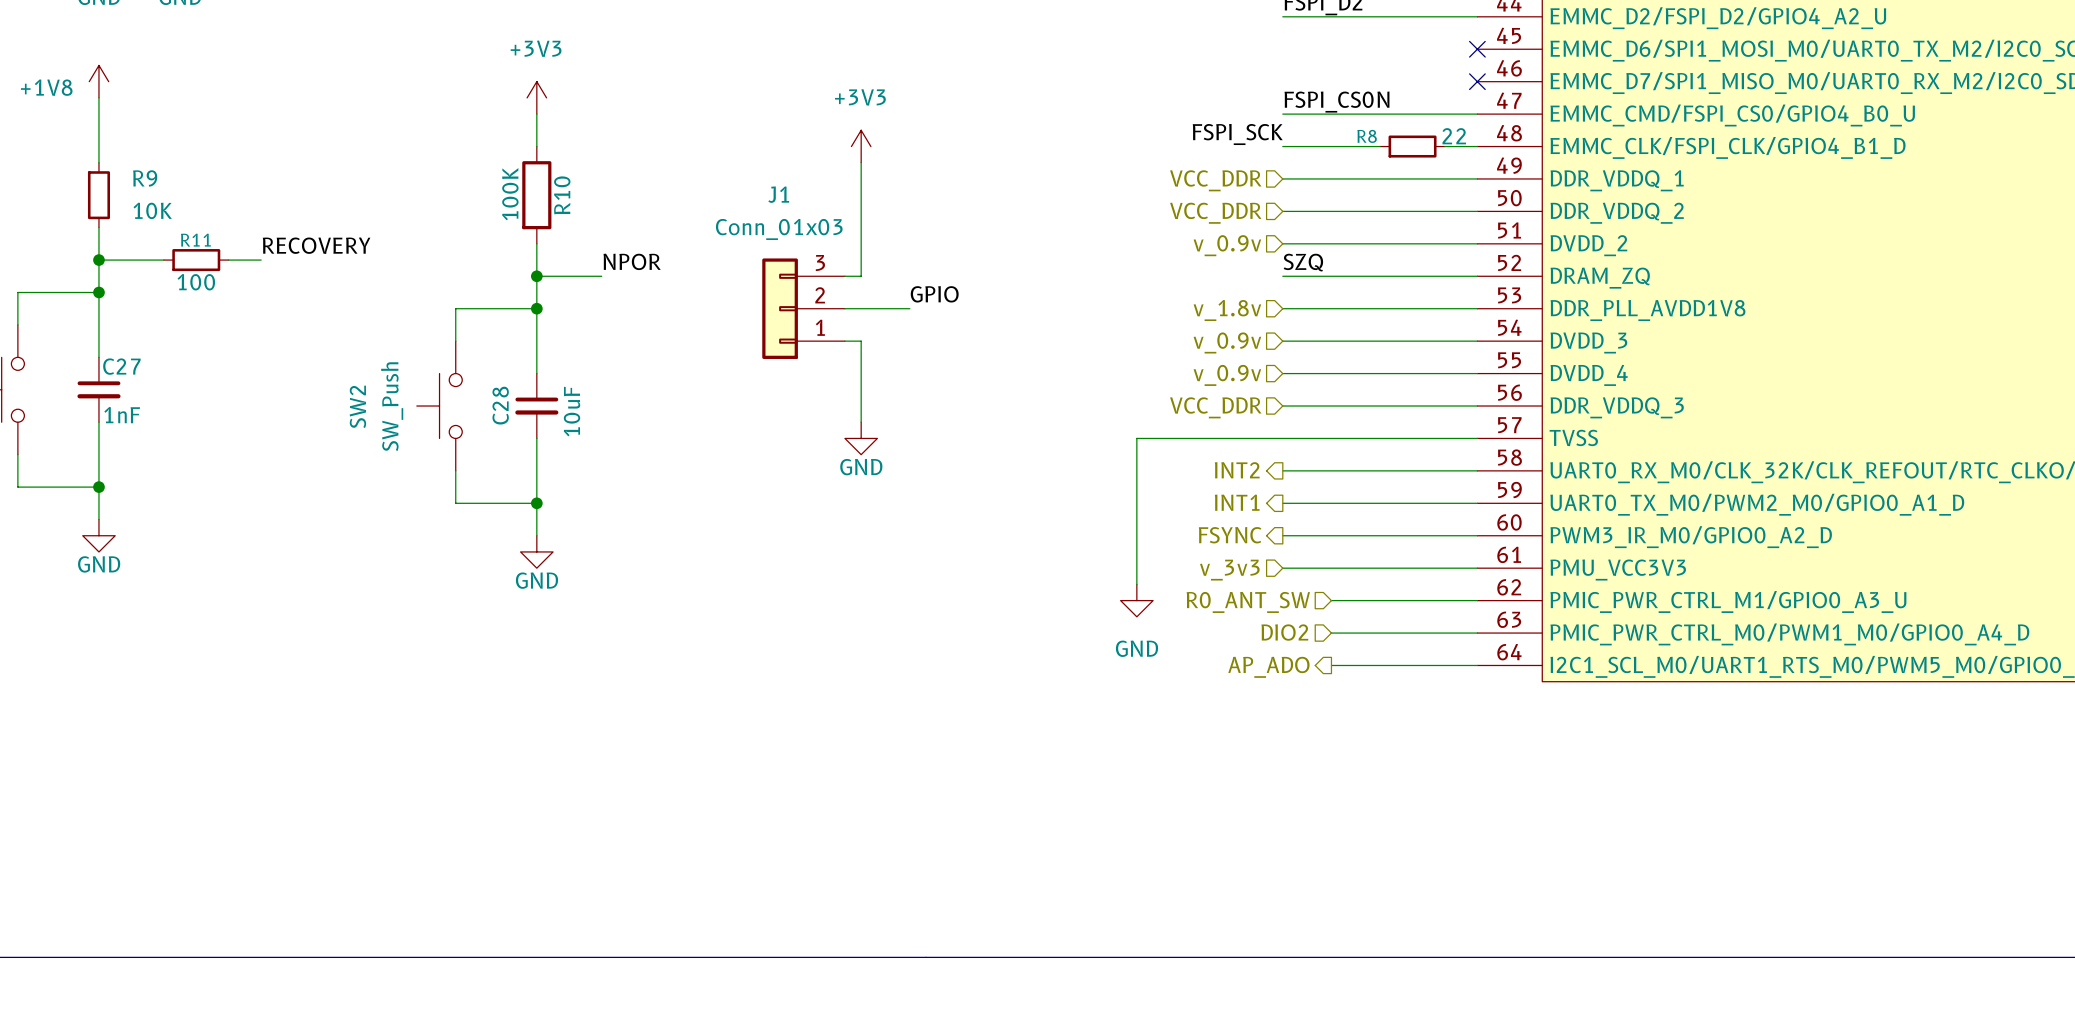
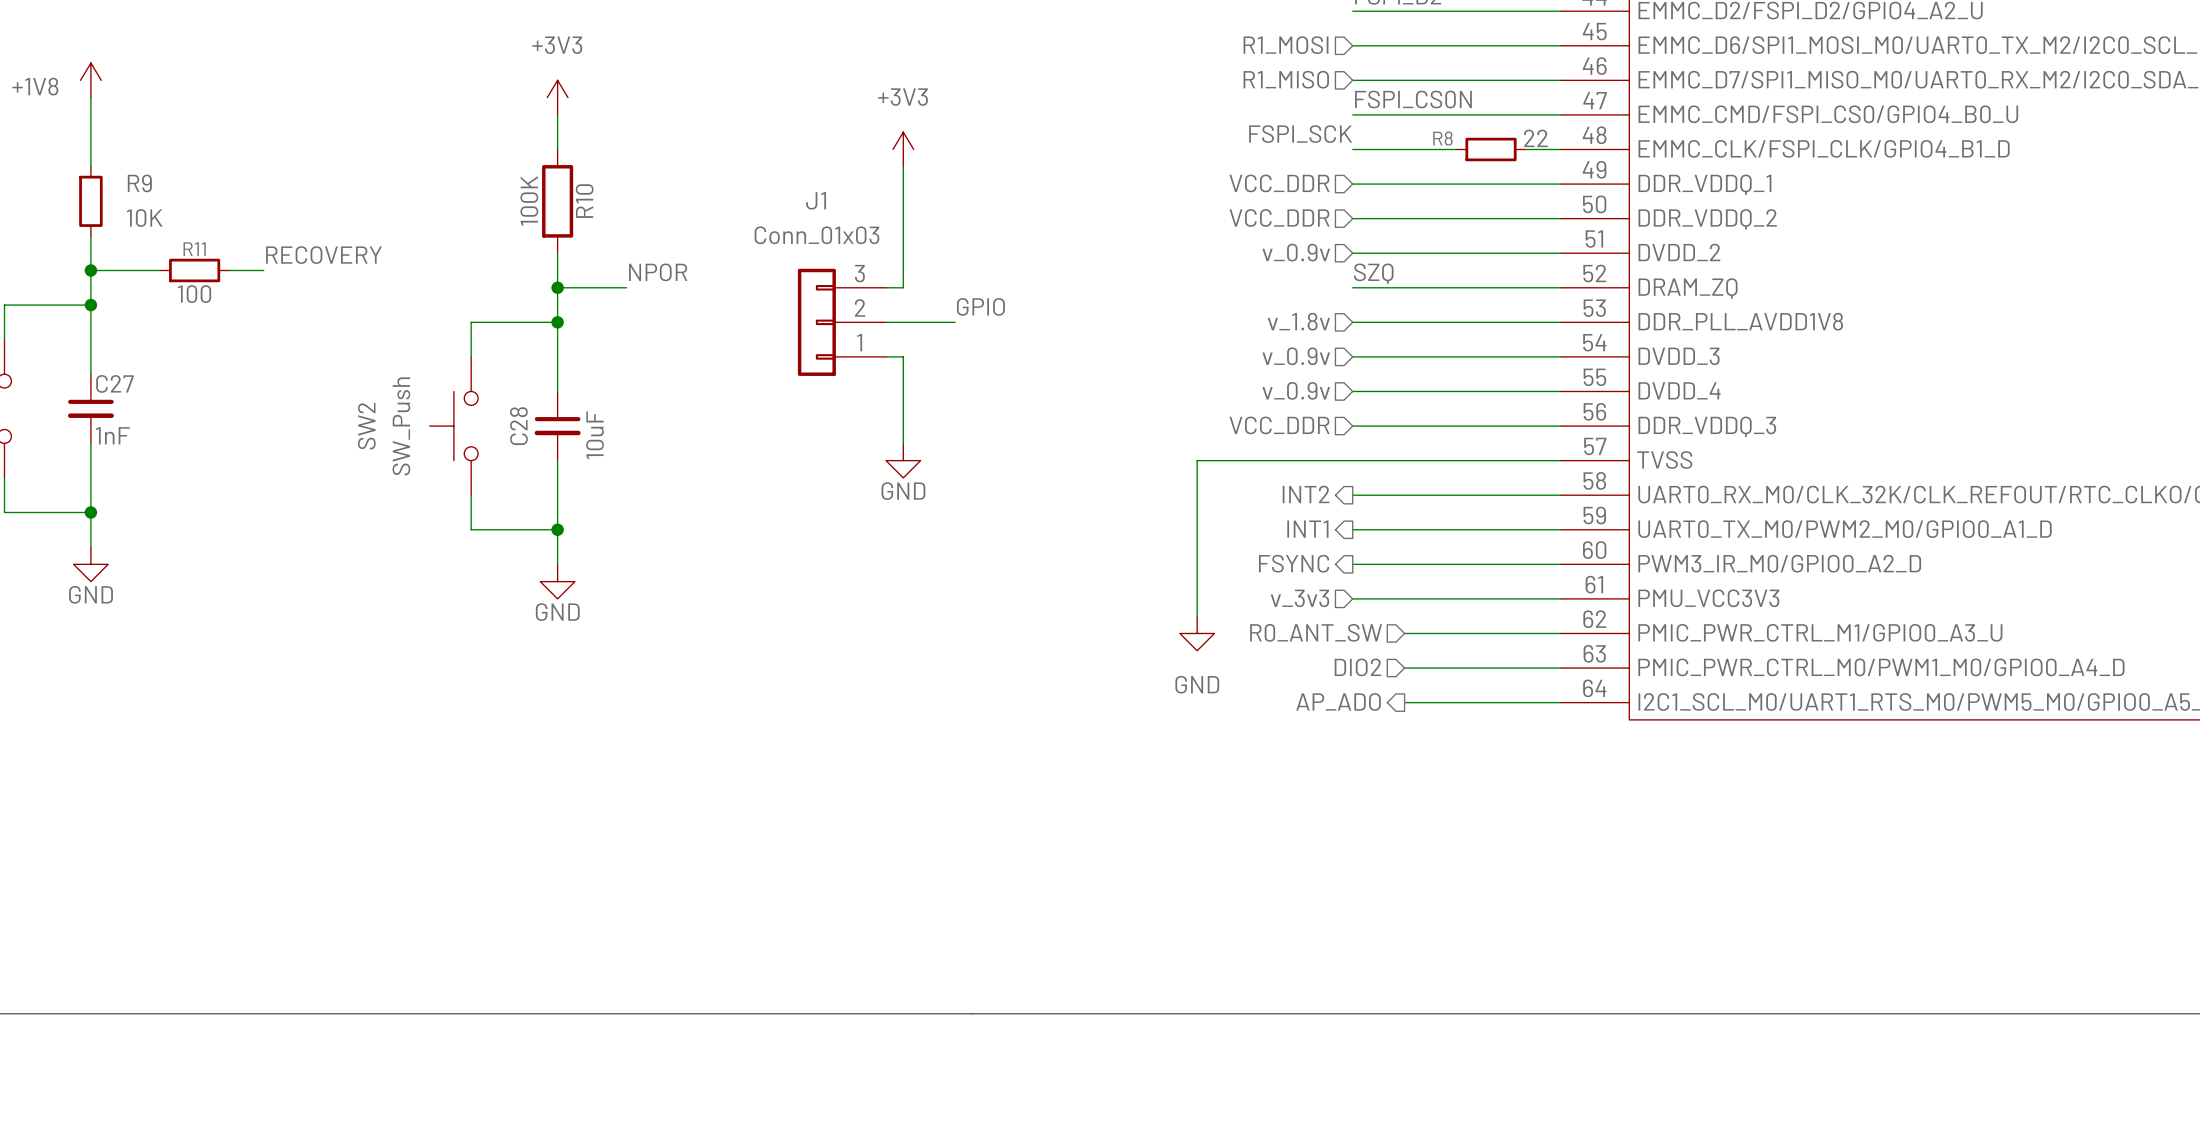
wire: none -> (1352, 45) (1560, 45)
no-connect mark: (1477, 49) -> none
hierarchical label: none -> R1_MOSI (1286, 45)
wire: none -> (1352, 80) (1560, 80)
no-connect mark: (1477, 81) -> none
hierarchical label: none -> R1_MISO (1286, 79)

